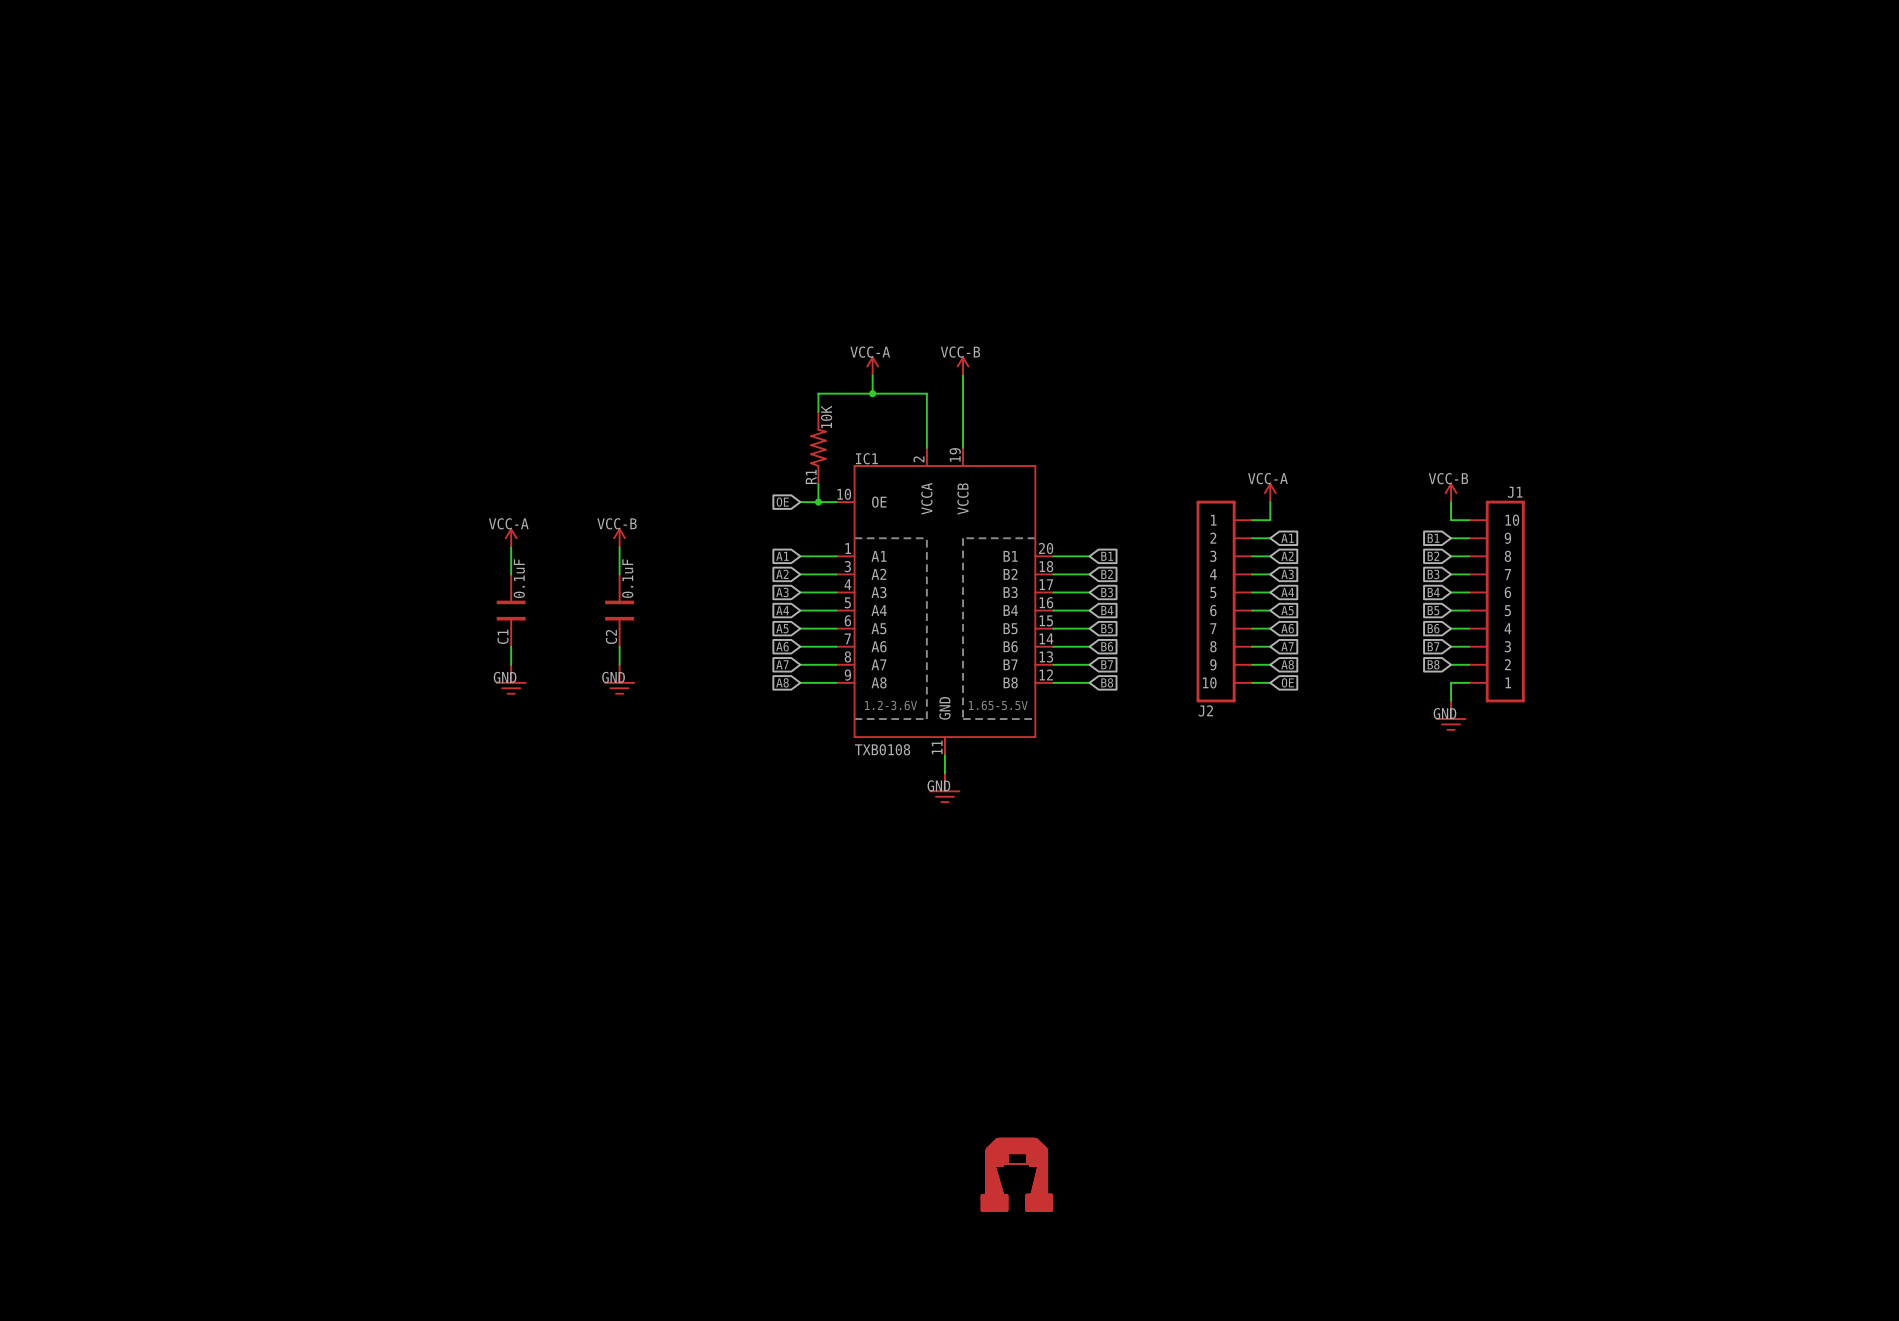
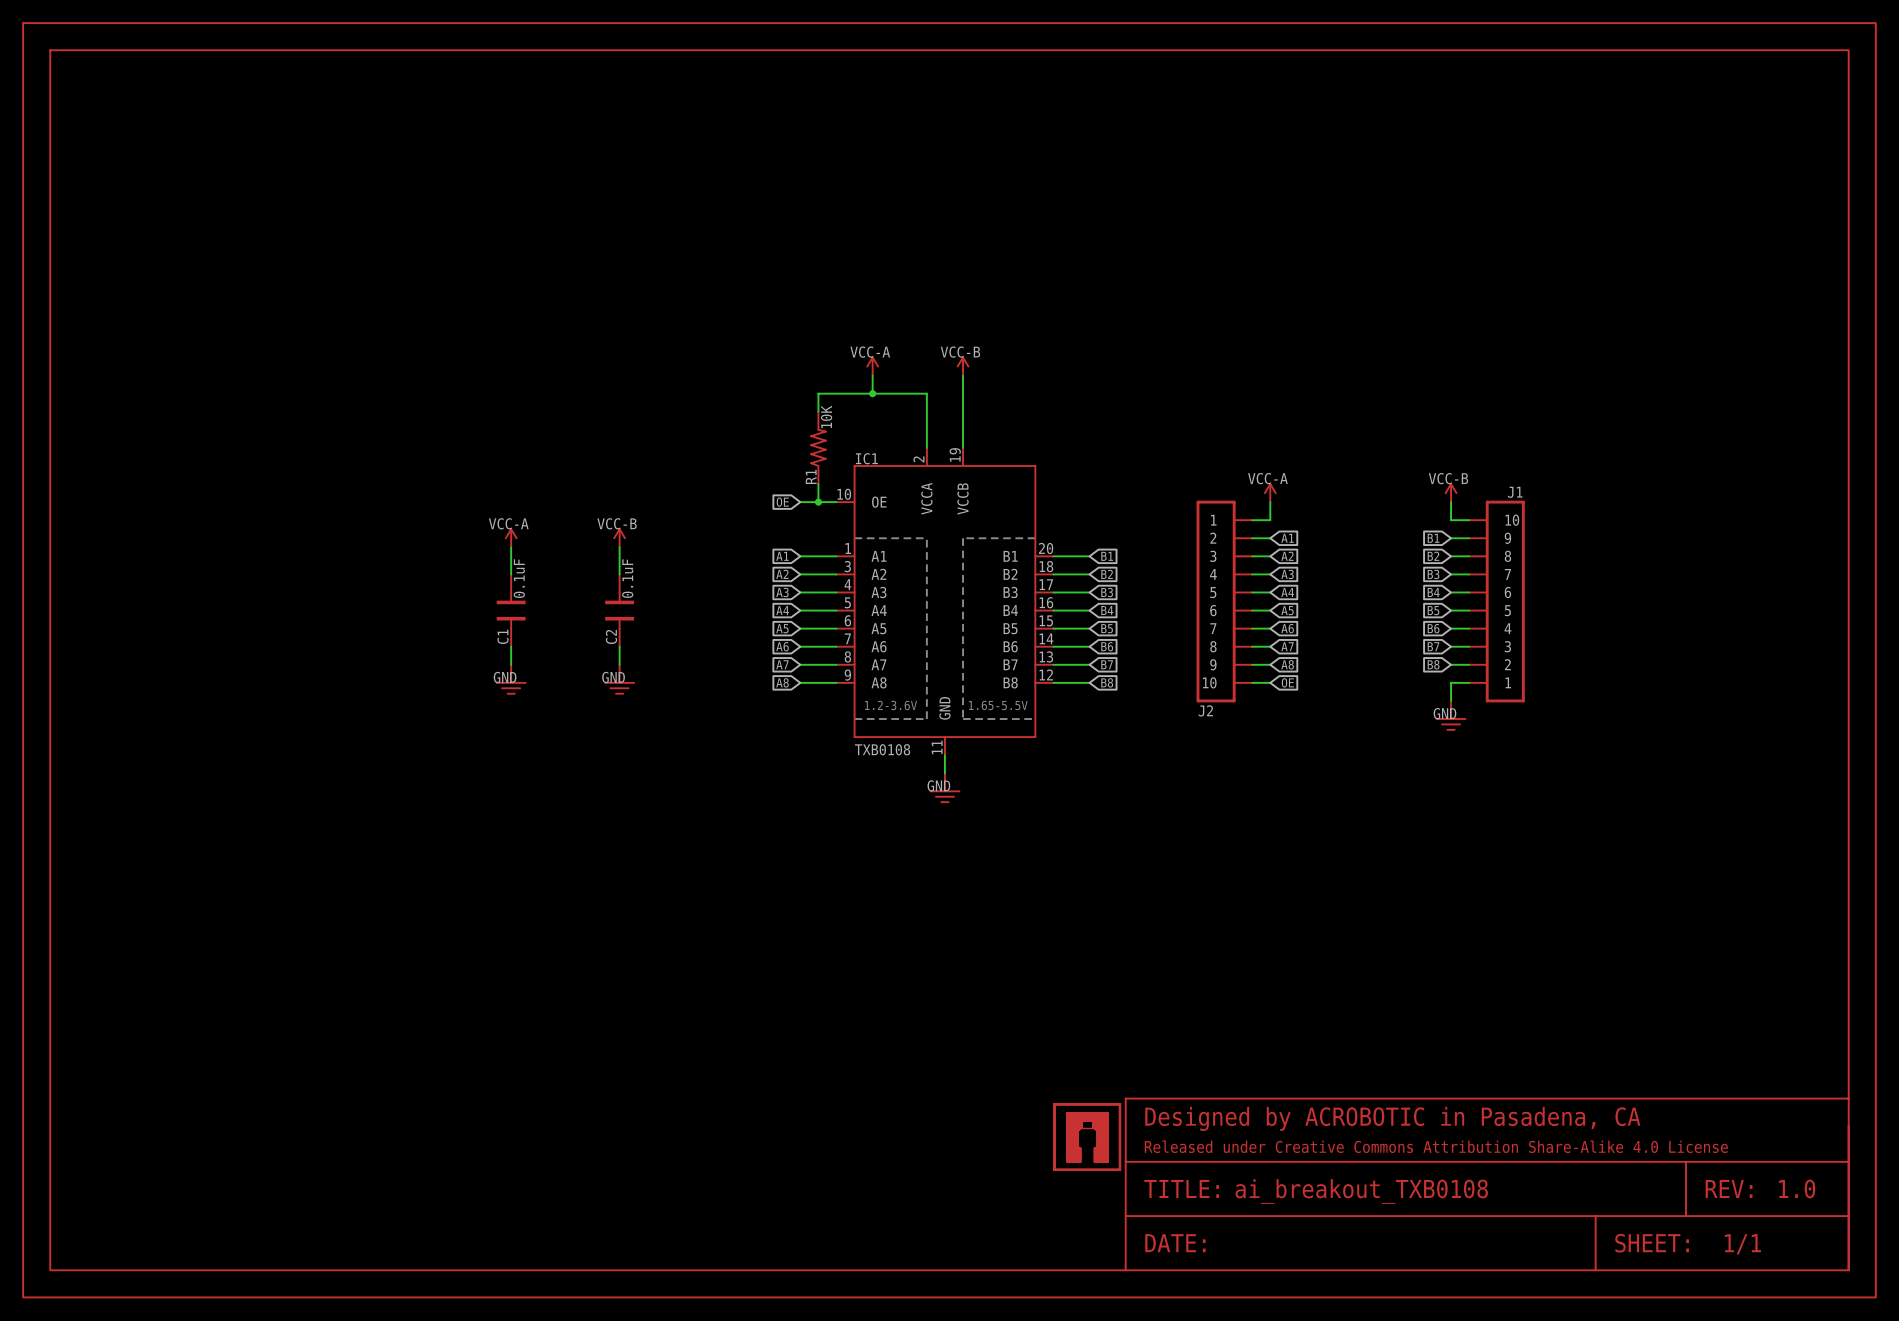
part: none -> (949, 660)
part: none -> (1087, 1137)
part: (1016, 1174) -> none
part: none -> (1487, 1184)

